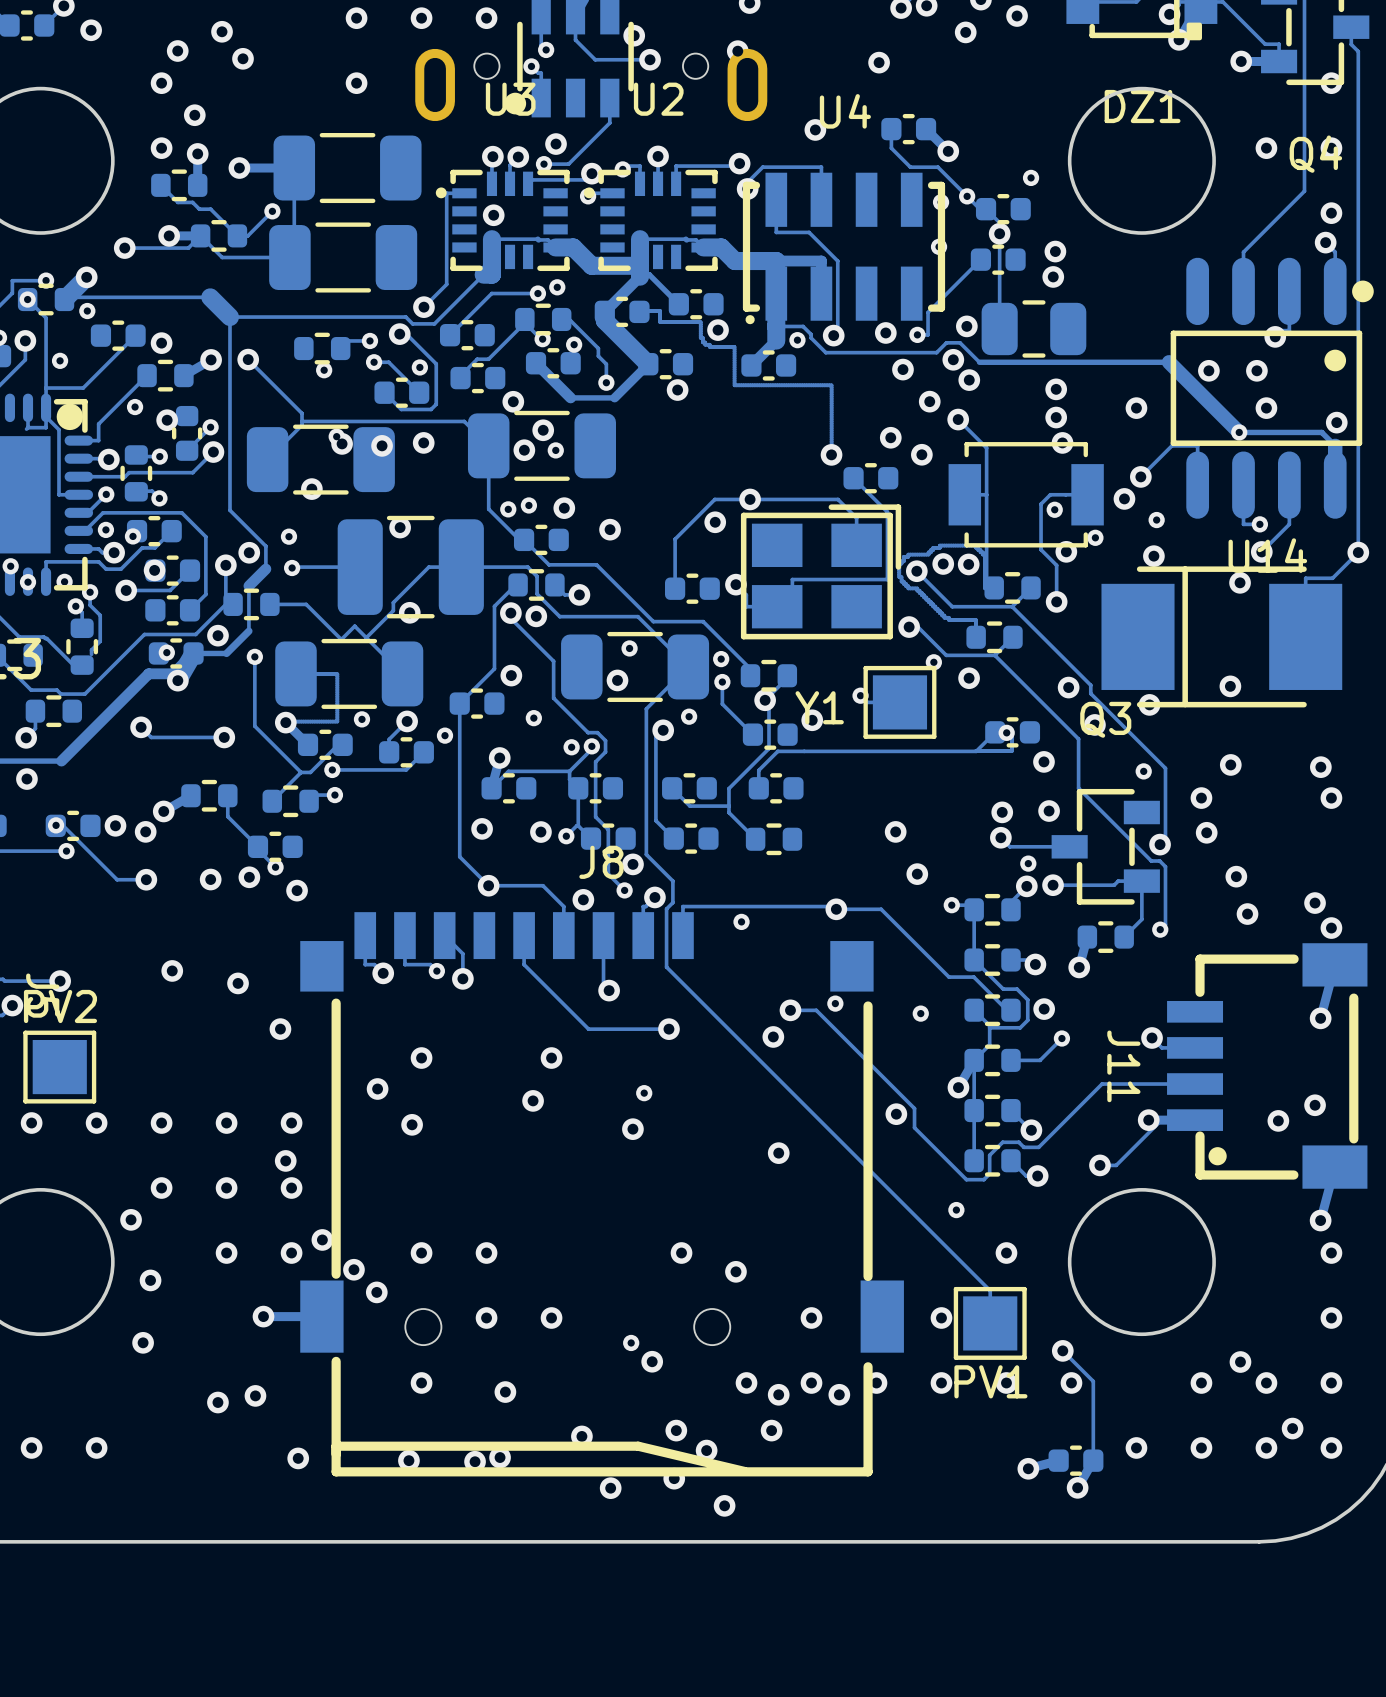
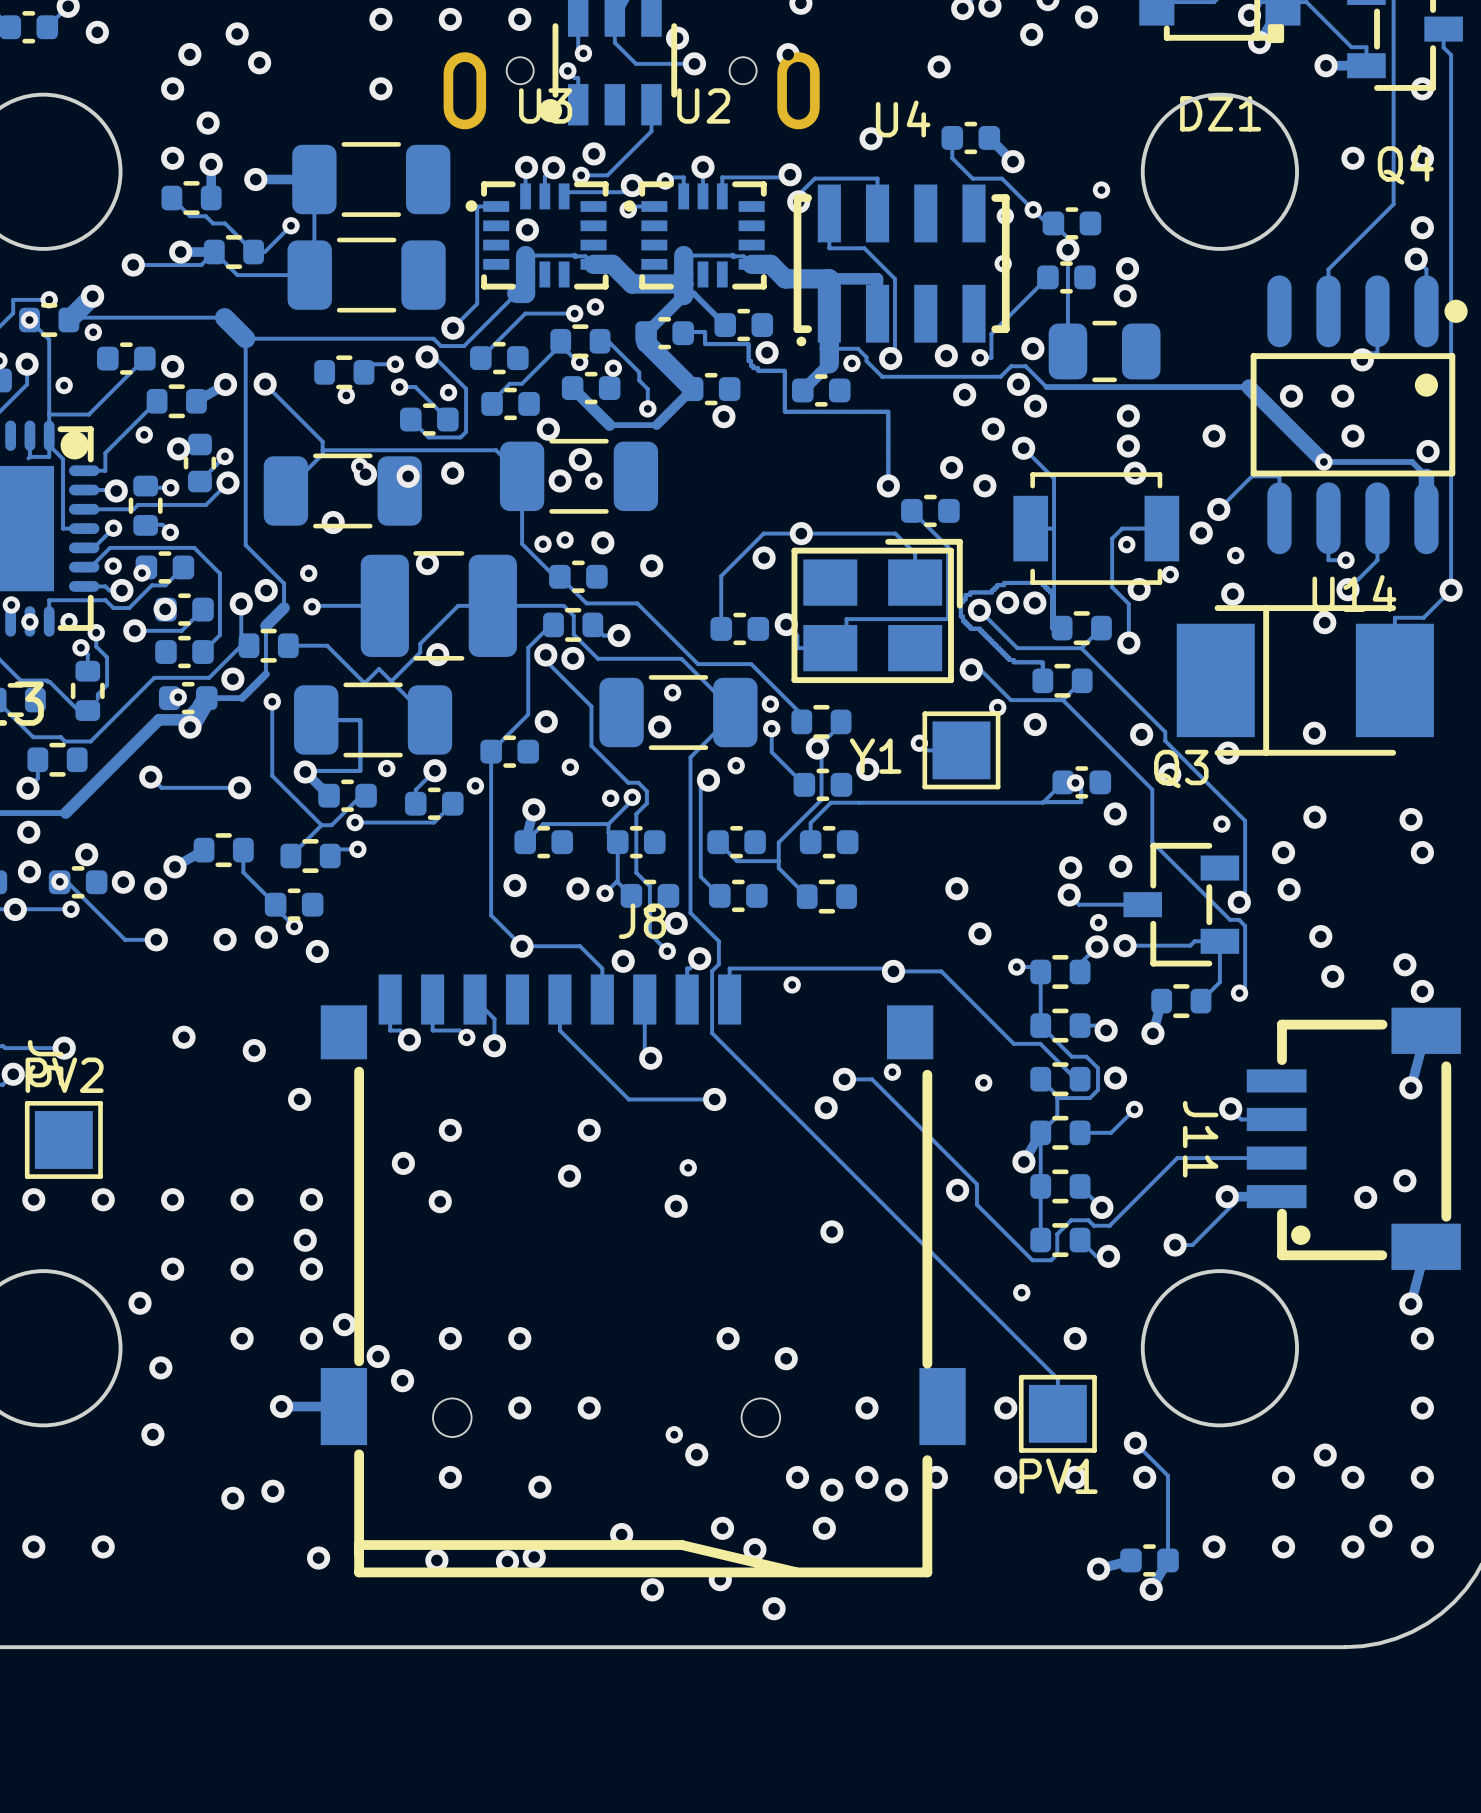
via: none -> (86, 854)
via: none -> (29, 871)
via: none -> (15, 909)

